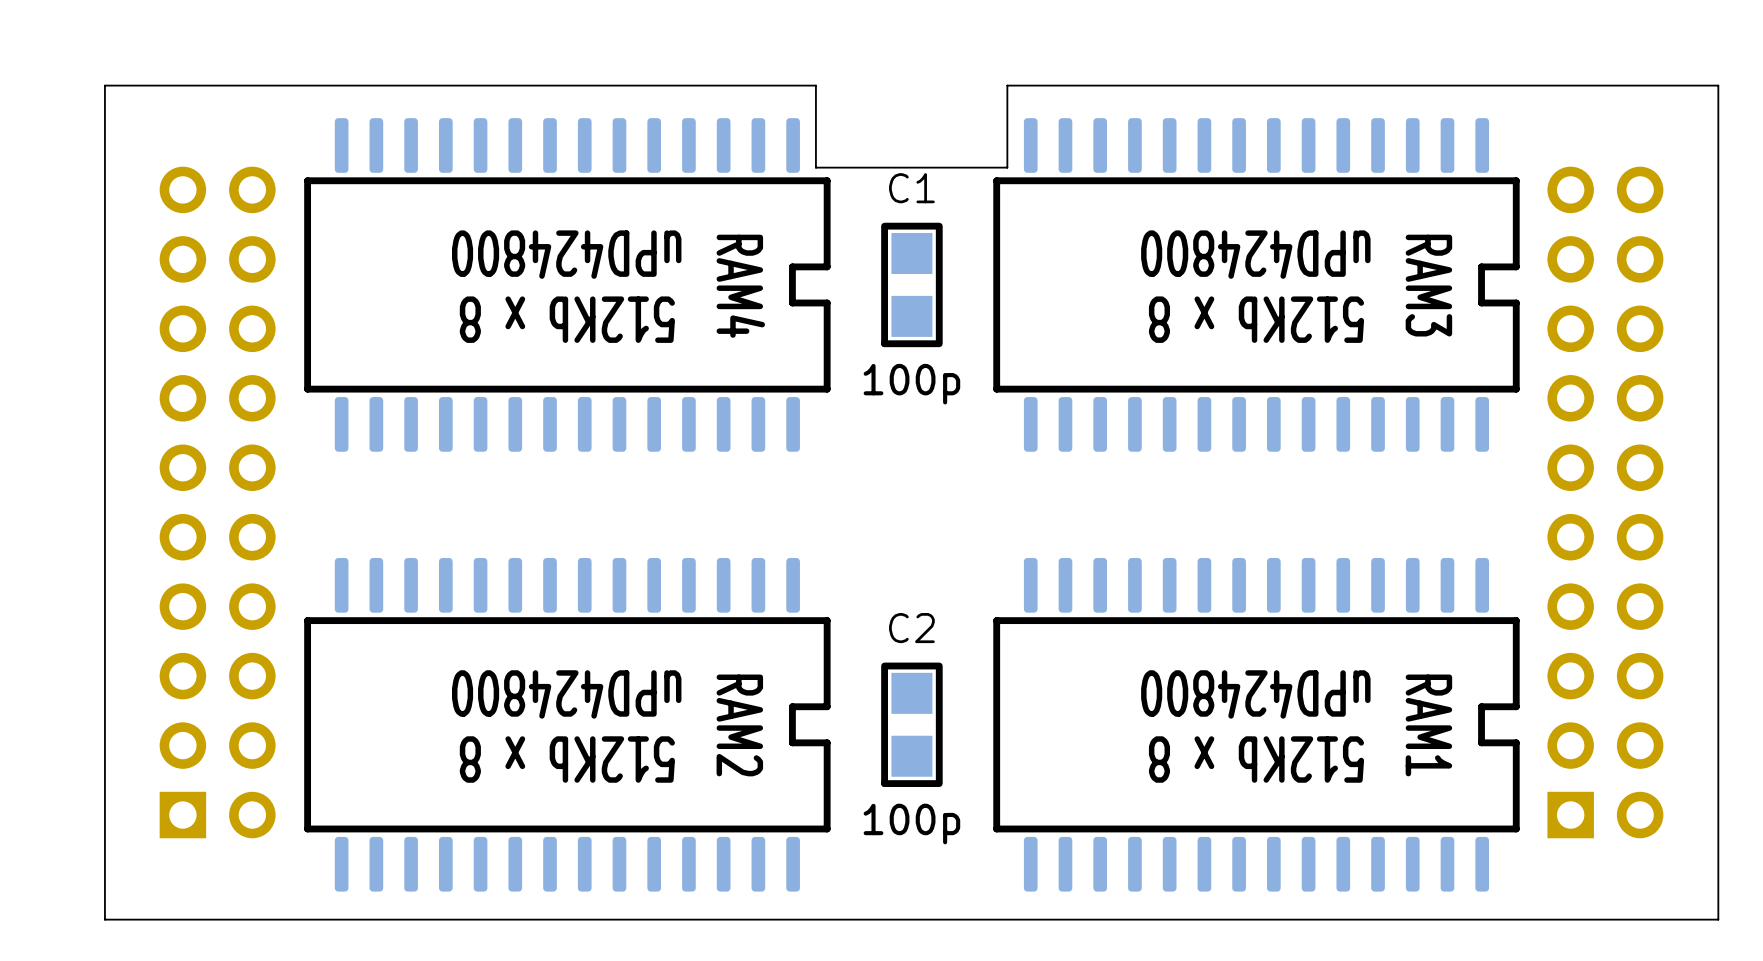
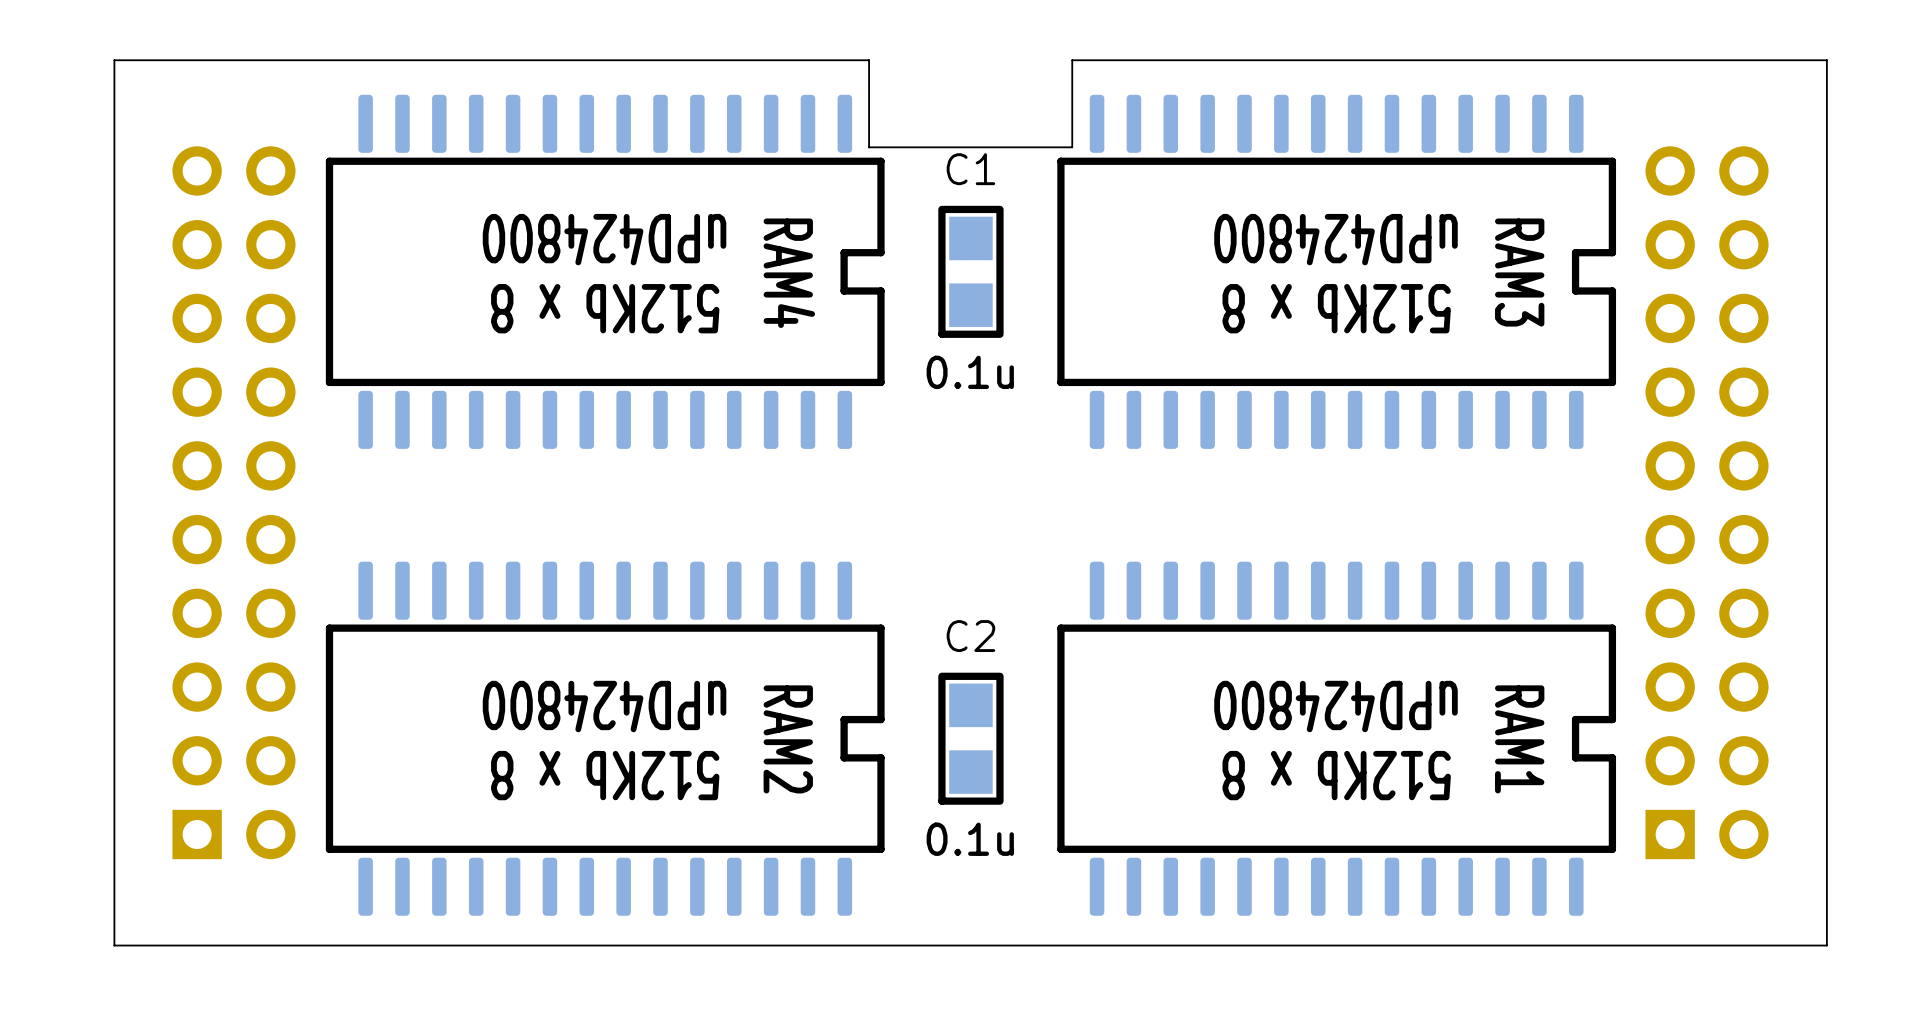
C1 text: 100p (911, 384) -> 0.1u (970, 372)
C2 text: 100p (911, 824) -> 0.1u (970, 839)

